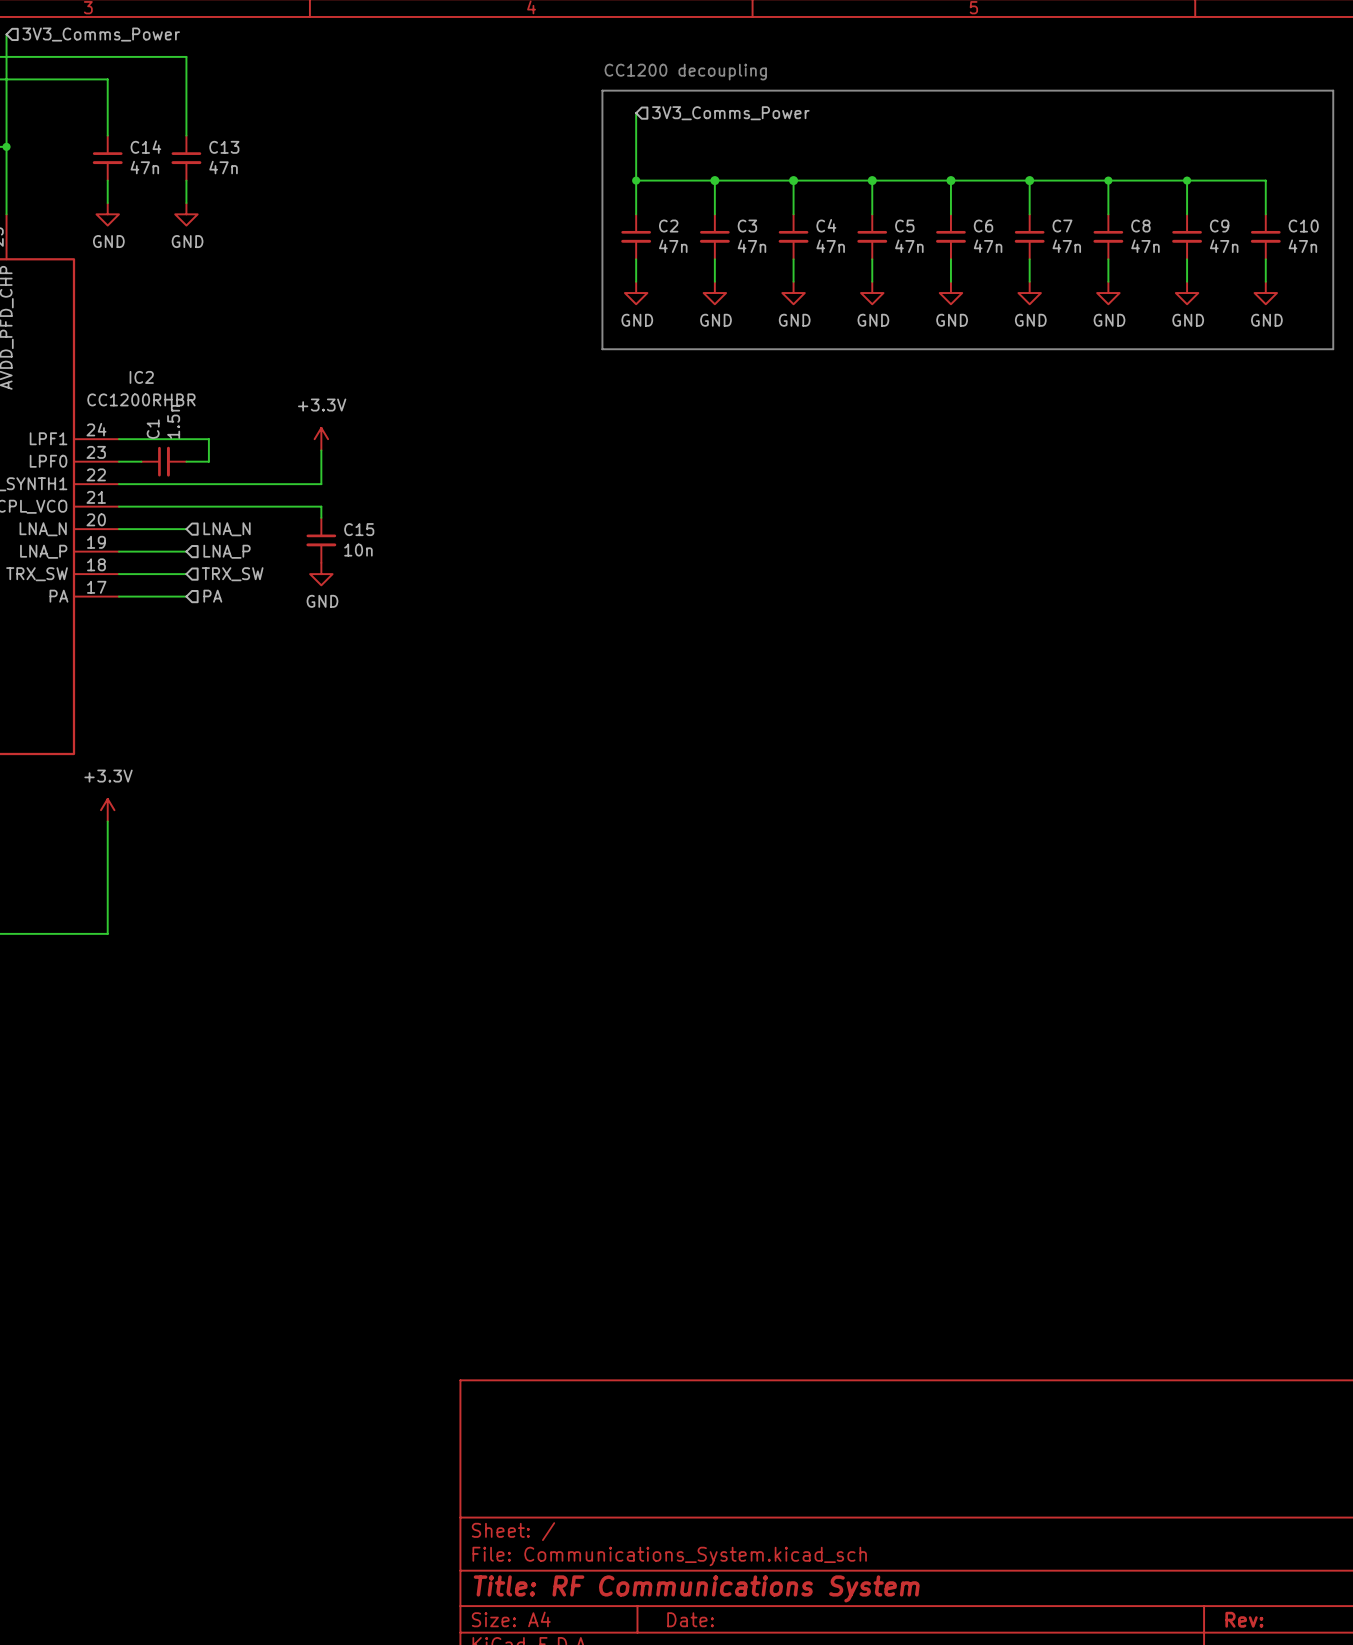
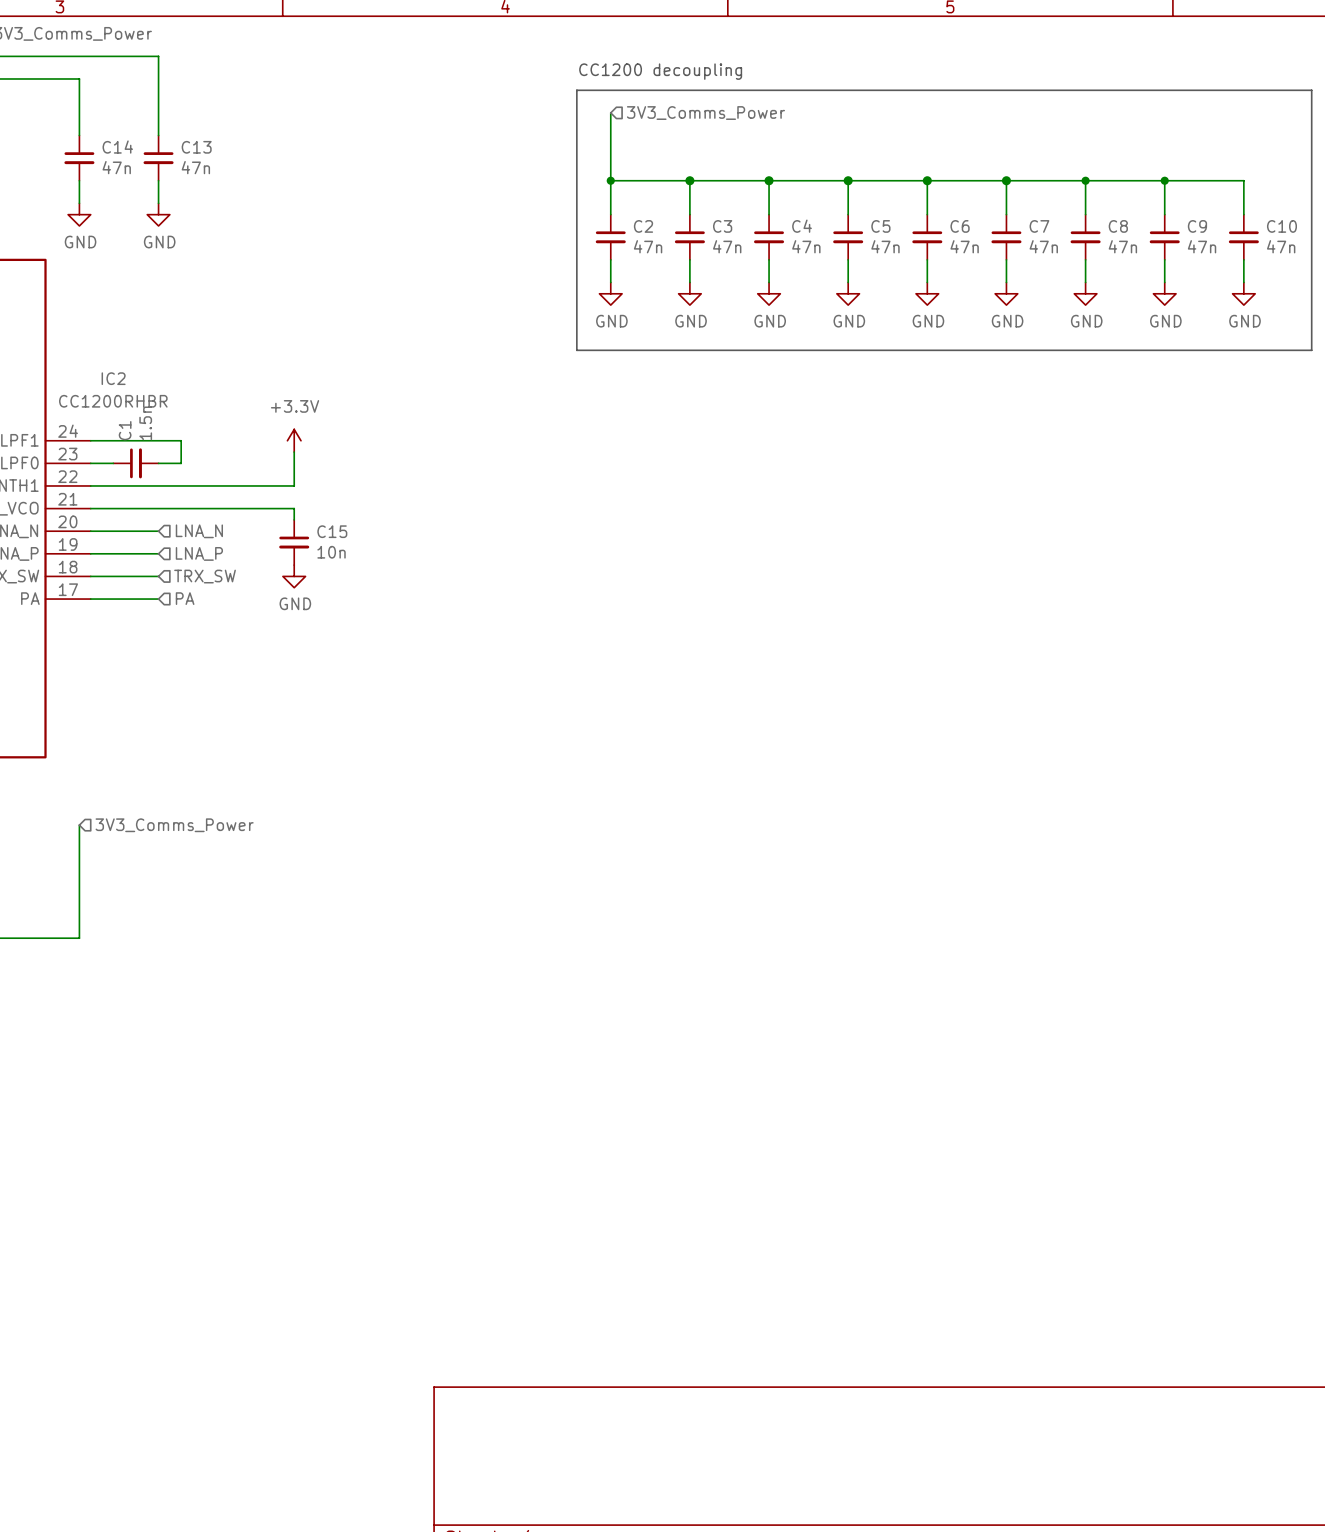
power symbol: +3.3V (107, 810) -> none
hierarchical label: none -> 3V3_Comms_Power (174, 825)

